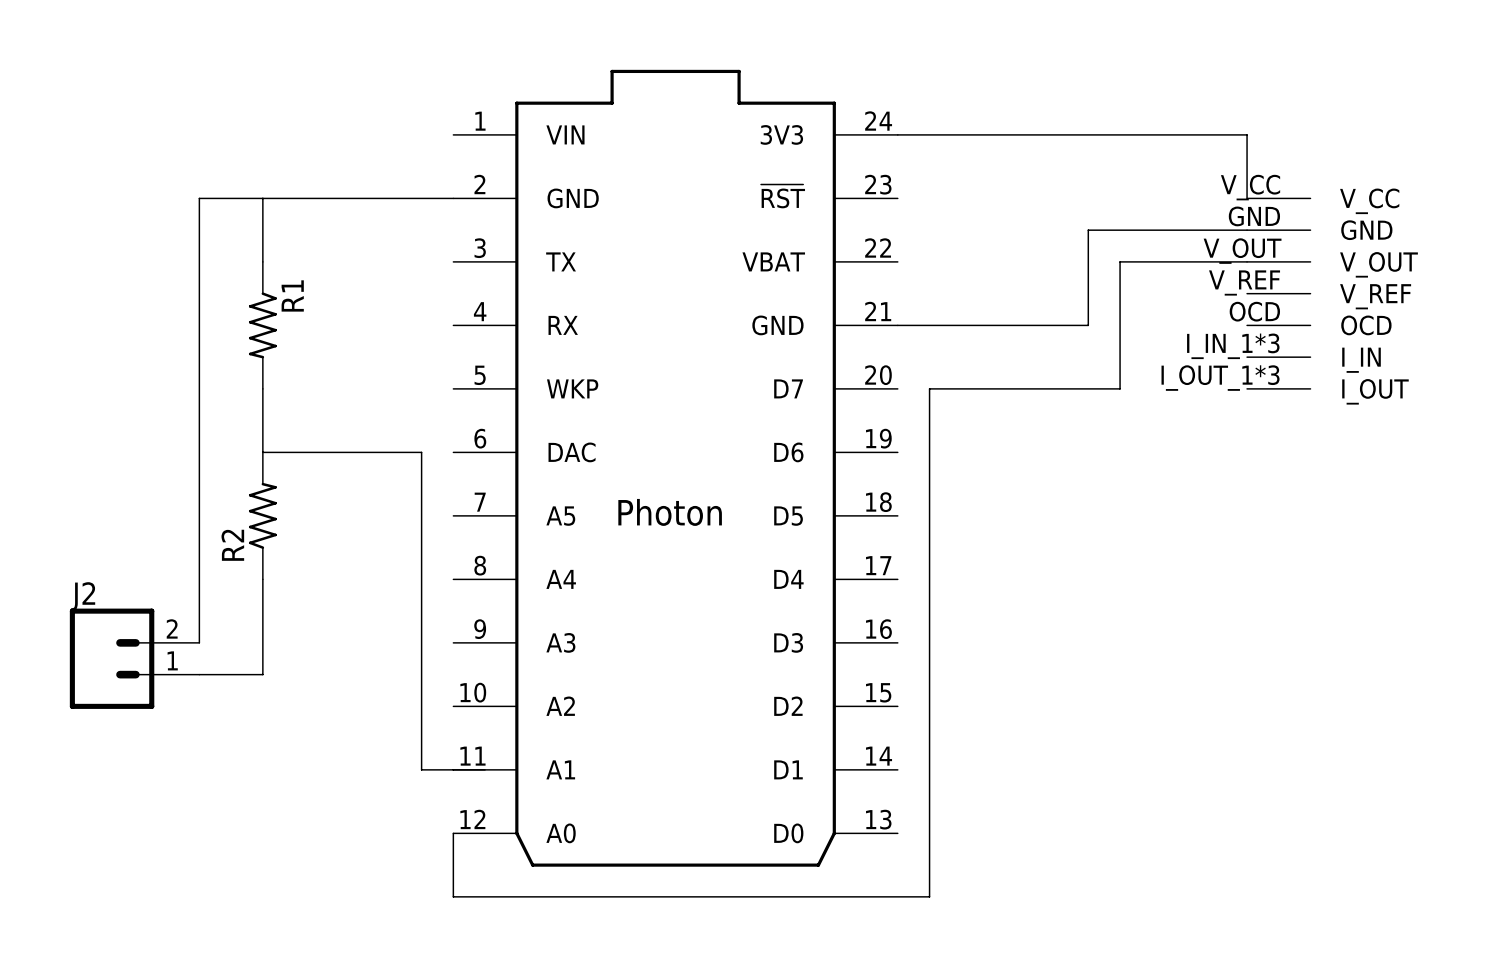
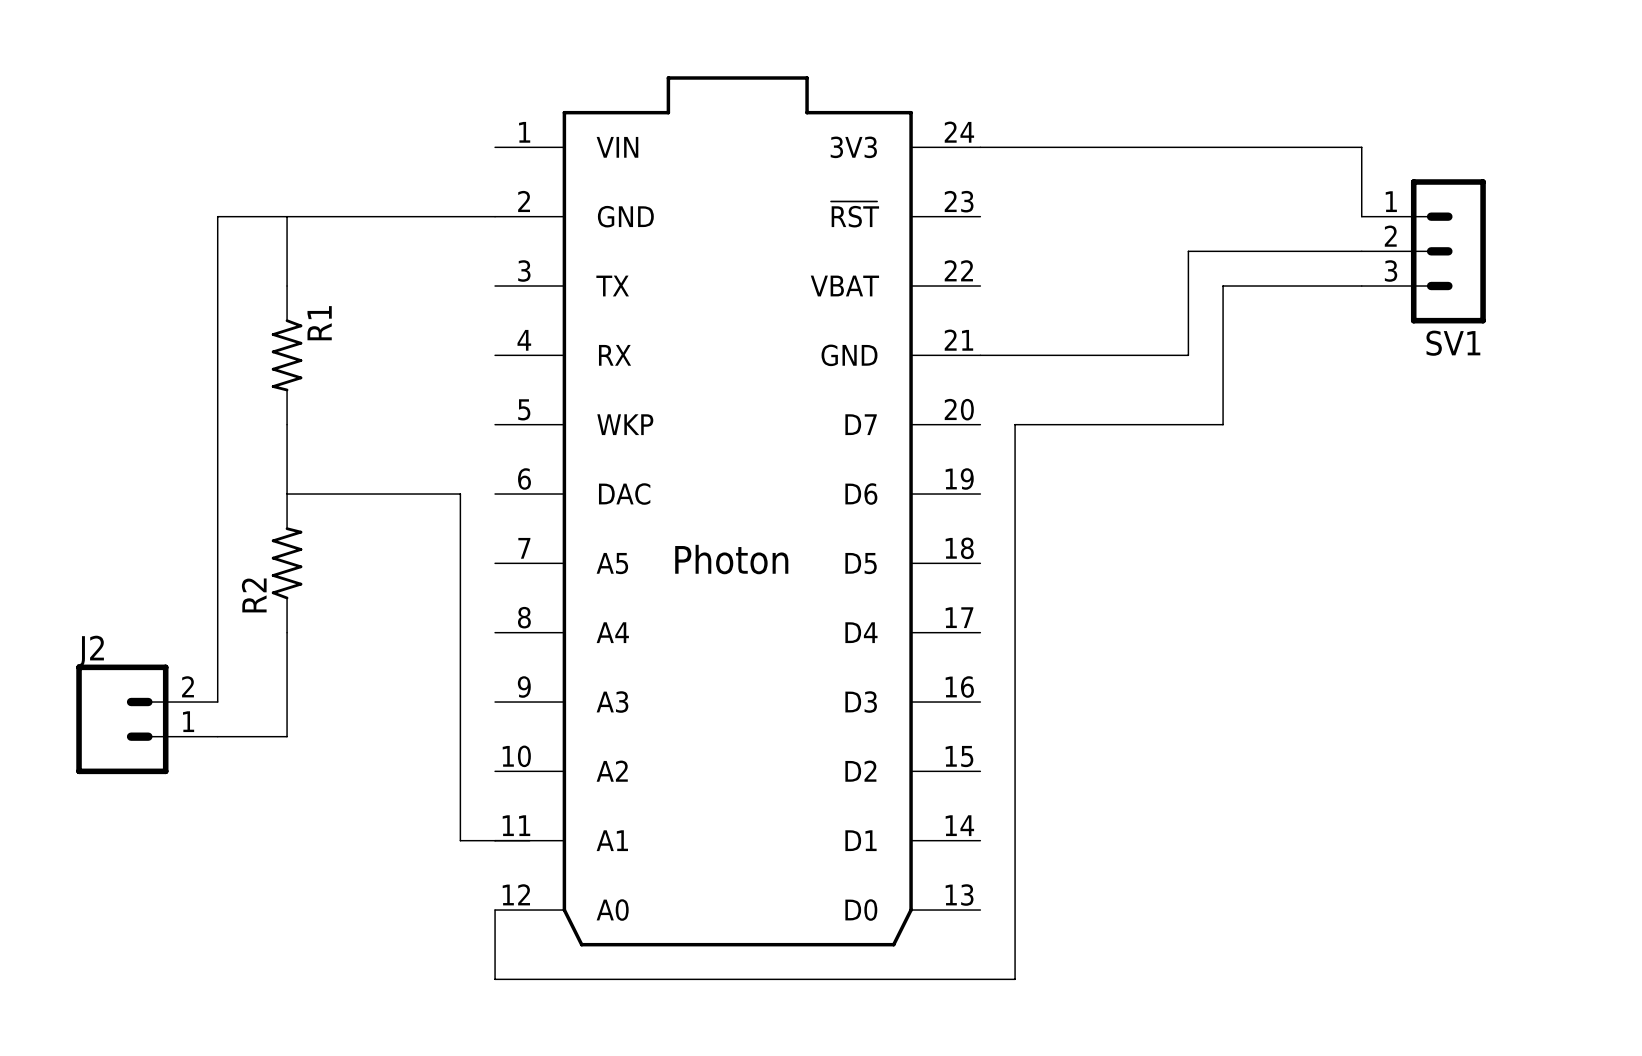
SV1: none -> (1423, 251)
part: (1278, 293) -> none

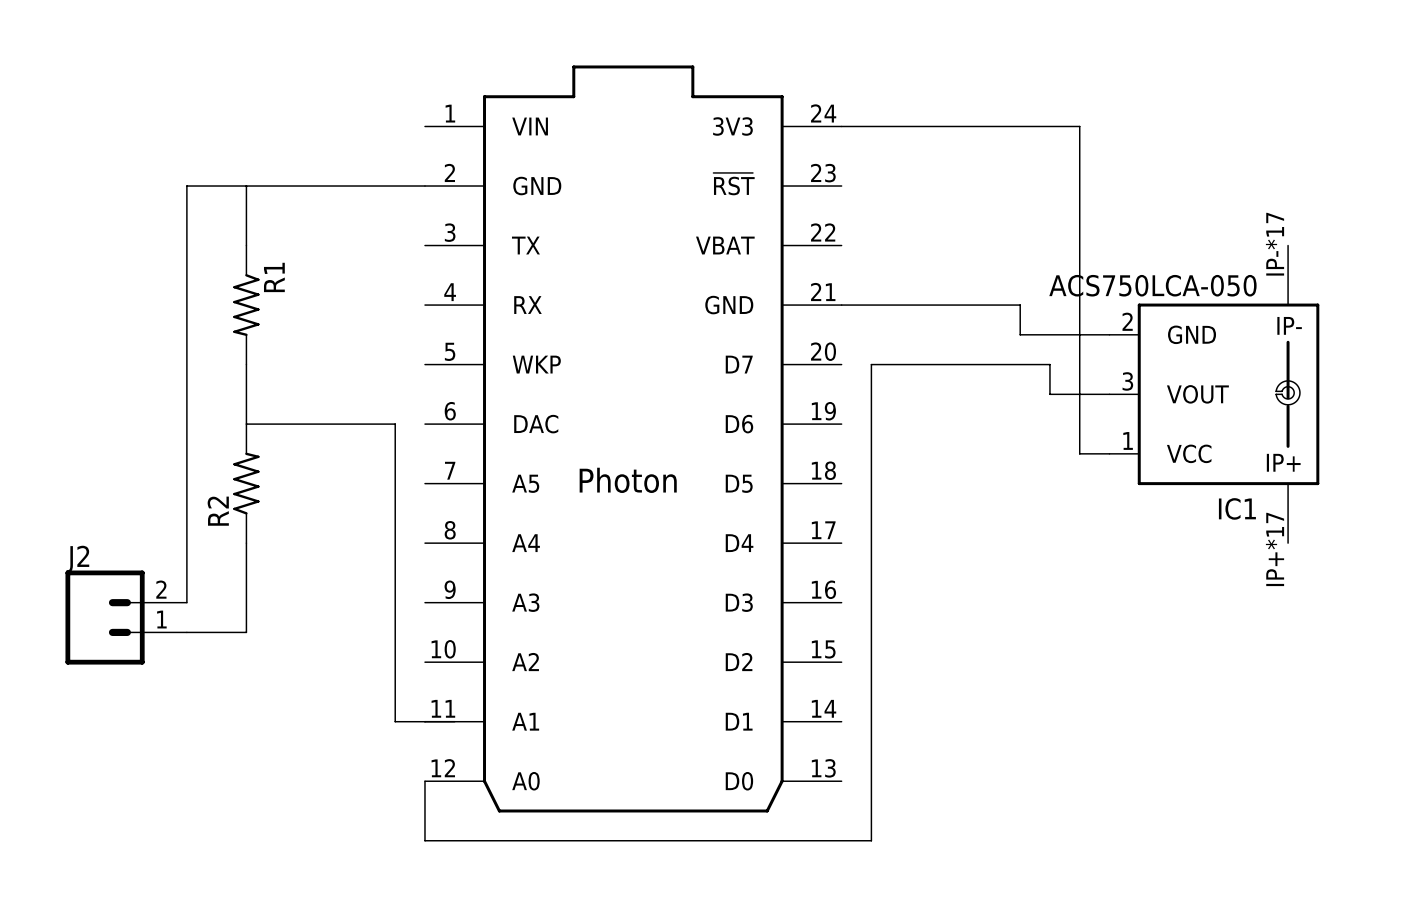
wire: (1257, 147) (1361, 147) (1361, 216) -> (1079, 126) (1079, 453) (1109, 453)
wire: (1361, 251) (1188, 251) (1188, 355) -> (1109, 334) (1020, 334) (1020, 305)
SV1: (1423, 251) -> none
wire: (1361, 286) (1223, 286) (1223, 424) -> (1109, 394) (1049, 394) (1049, 364)
IC1: none -> ACS750LCA-050 (1214, 394)

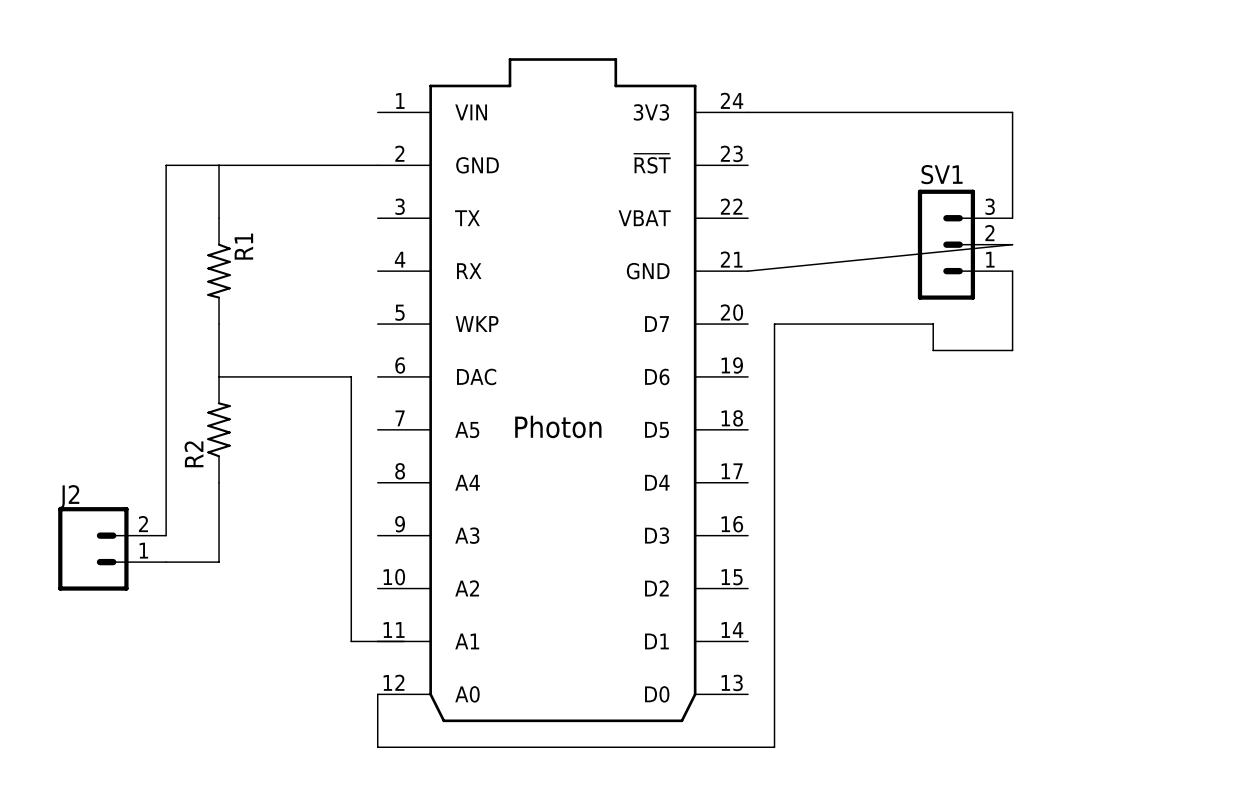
wire: (1079, 126) (1079, 453) (1109, 453) -> (959, 112) (1012, 112) (1012, 218)
SV1: none -> (965, 244)
wire: (841, 305) (1020, 305) (1020, 334) (1109, 334) -> (748, 271) (1012, 244)
IC1: ACS750LCA-050 (1214, 394) -> none

